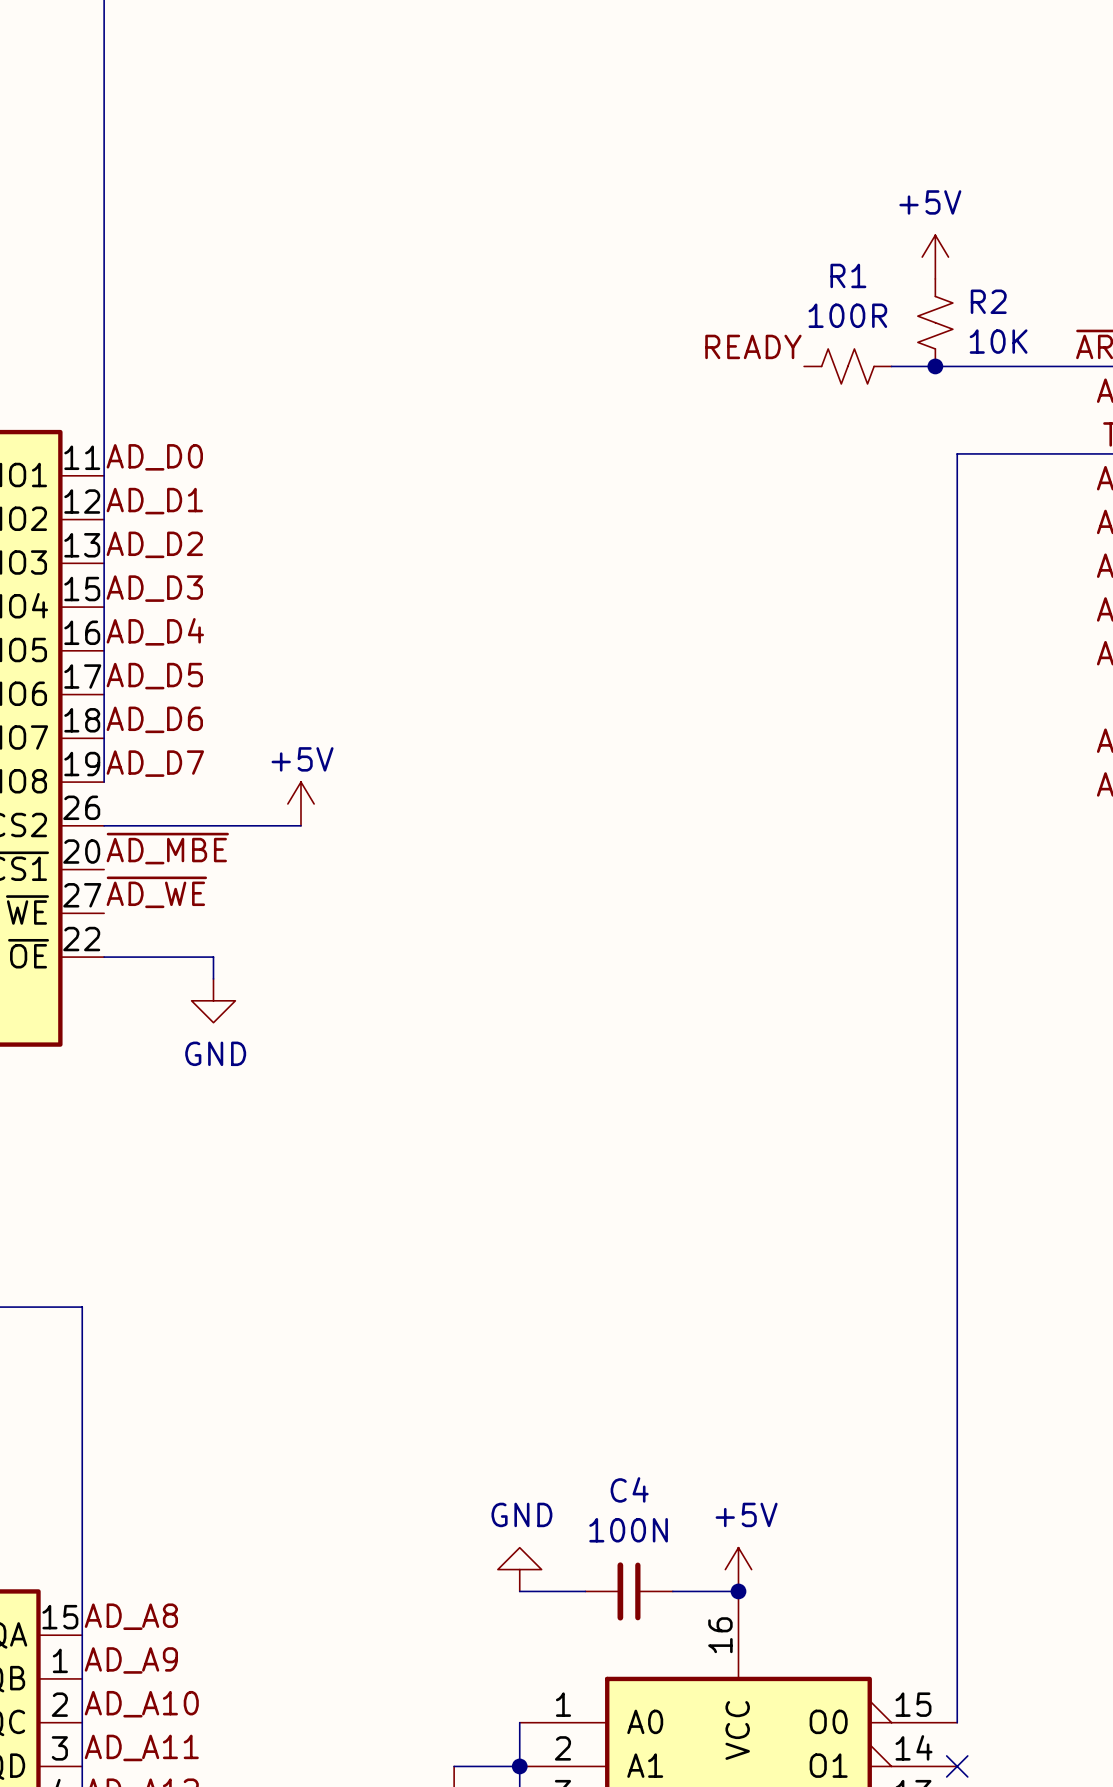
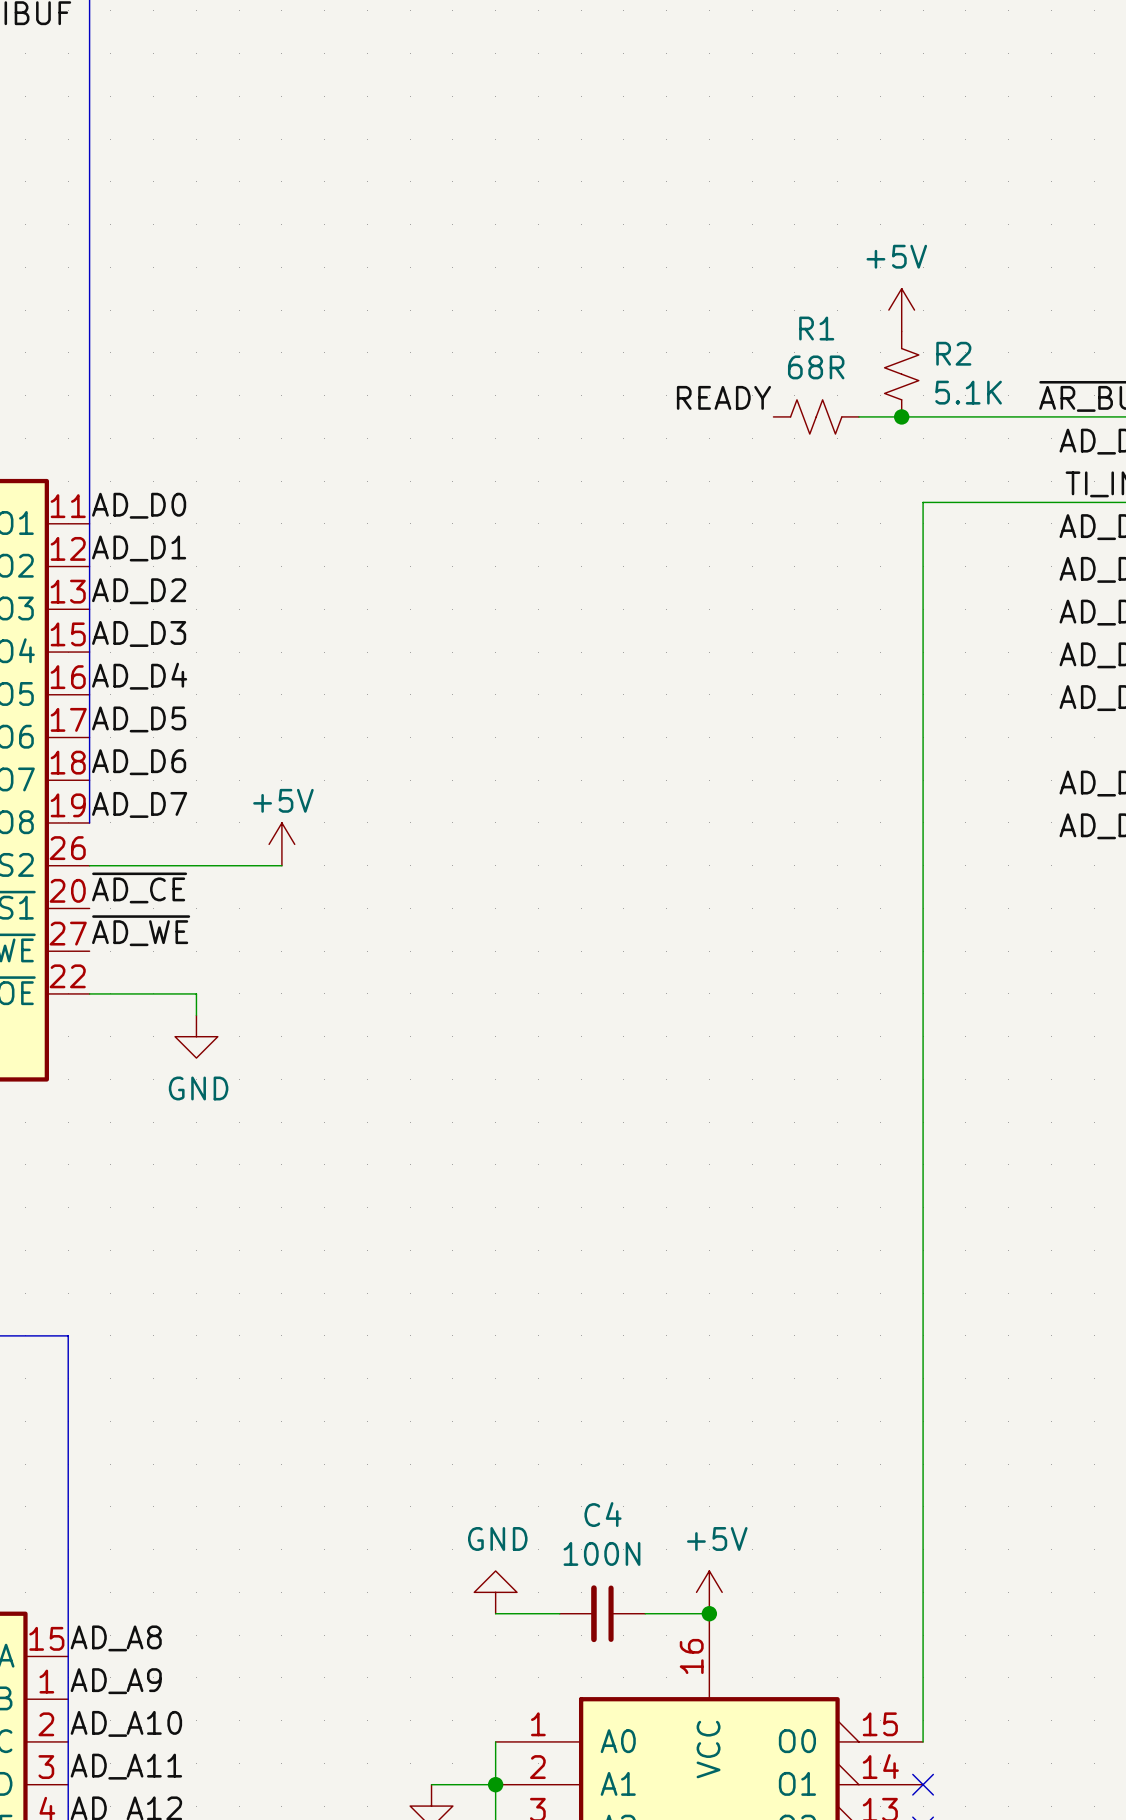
R1 value: 100R (847, 315) -> 68R (816, 367)
R2 value: 10K (998, 341) -> 5.1K (968, 392)
label: ~{AD_MBE} (167, 848) -> ~{AD_CE} (139, 887)

